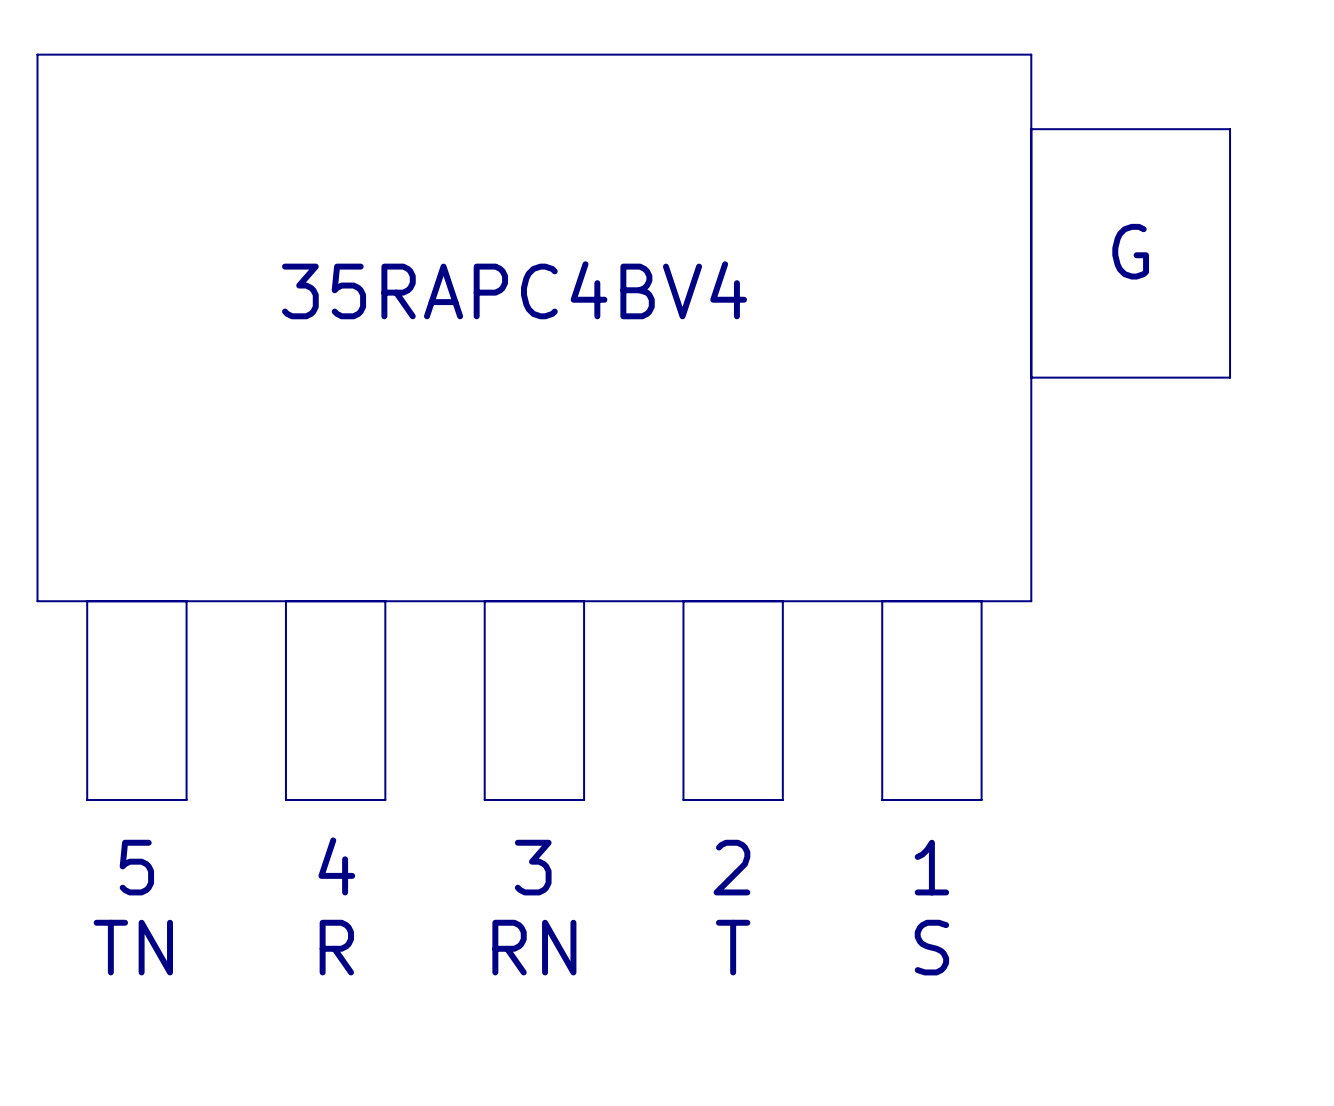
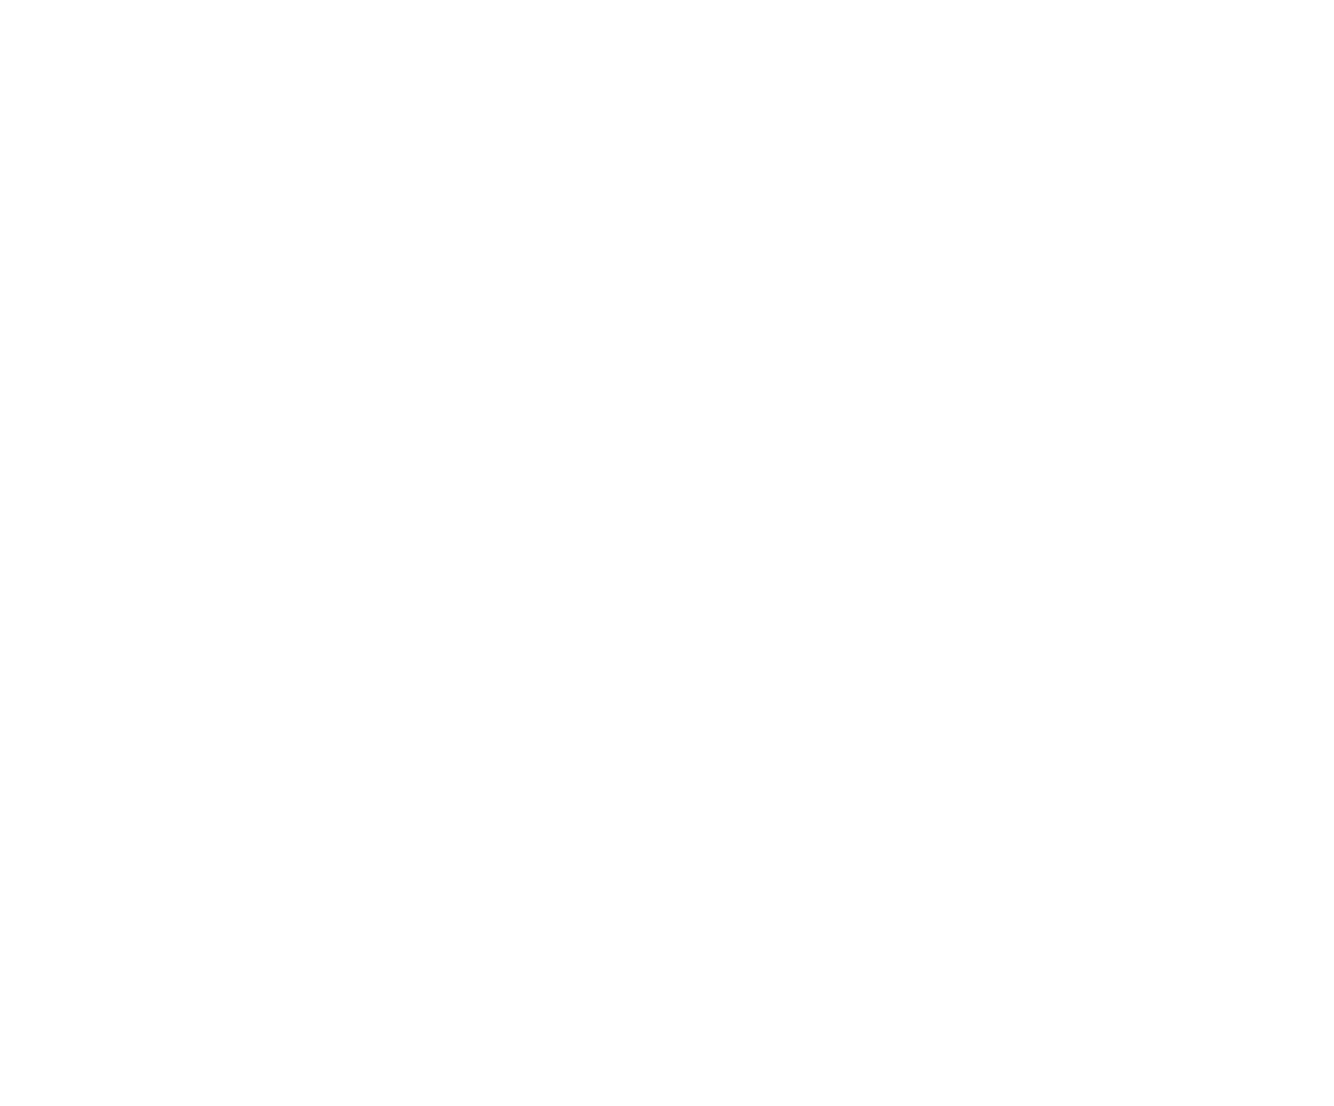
line: (37, 54) (1031, 54) (1031, 601) (37, 601) (37, 54) -> none
line: (1031, 129) (1230, 129) (1230, 377) (1031, 377) -> none
text: G (1130, 251) -> none
text: 35RAPC4BV4 (514, 290) -> none
line: (87, 601) (87, 799) (186, 799) (186, 601) -> none
line: (285, 601) (285, 799) (385, 799) (385, 601) -> none
line: (484, 601) (484, 799) (584, 799) (584, 601) -> none
line: (683, 601) (683, 799) (782, 799) (782, 601) -> none
line: (882, 601) (882, 799) (981, 799) (981, 601) -> none
text: 4 (336, 866) -> none
text: 5 (136, 867) -> none
text: 3 (533, 867) -> none
text: 2 (731, 867) -> none
text: 1 (931, 867) -> none
text: TN (133, 947) -> none
text: R (336, 947) -> none
text: RN (534, 947) -> none
text: T (733, 947) -> none
text: S (931, 947) -> none

